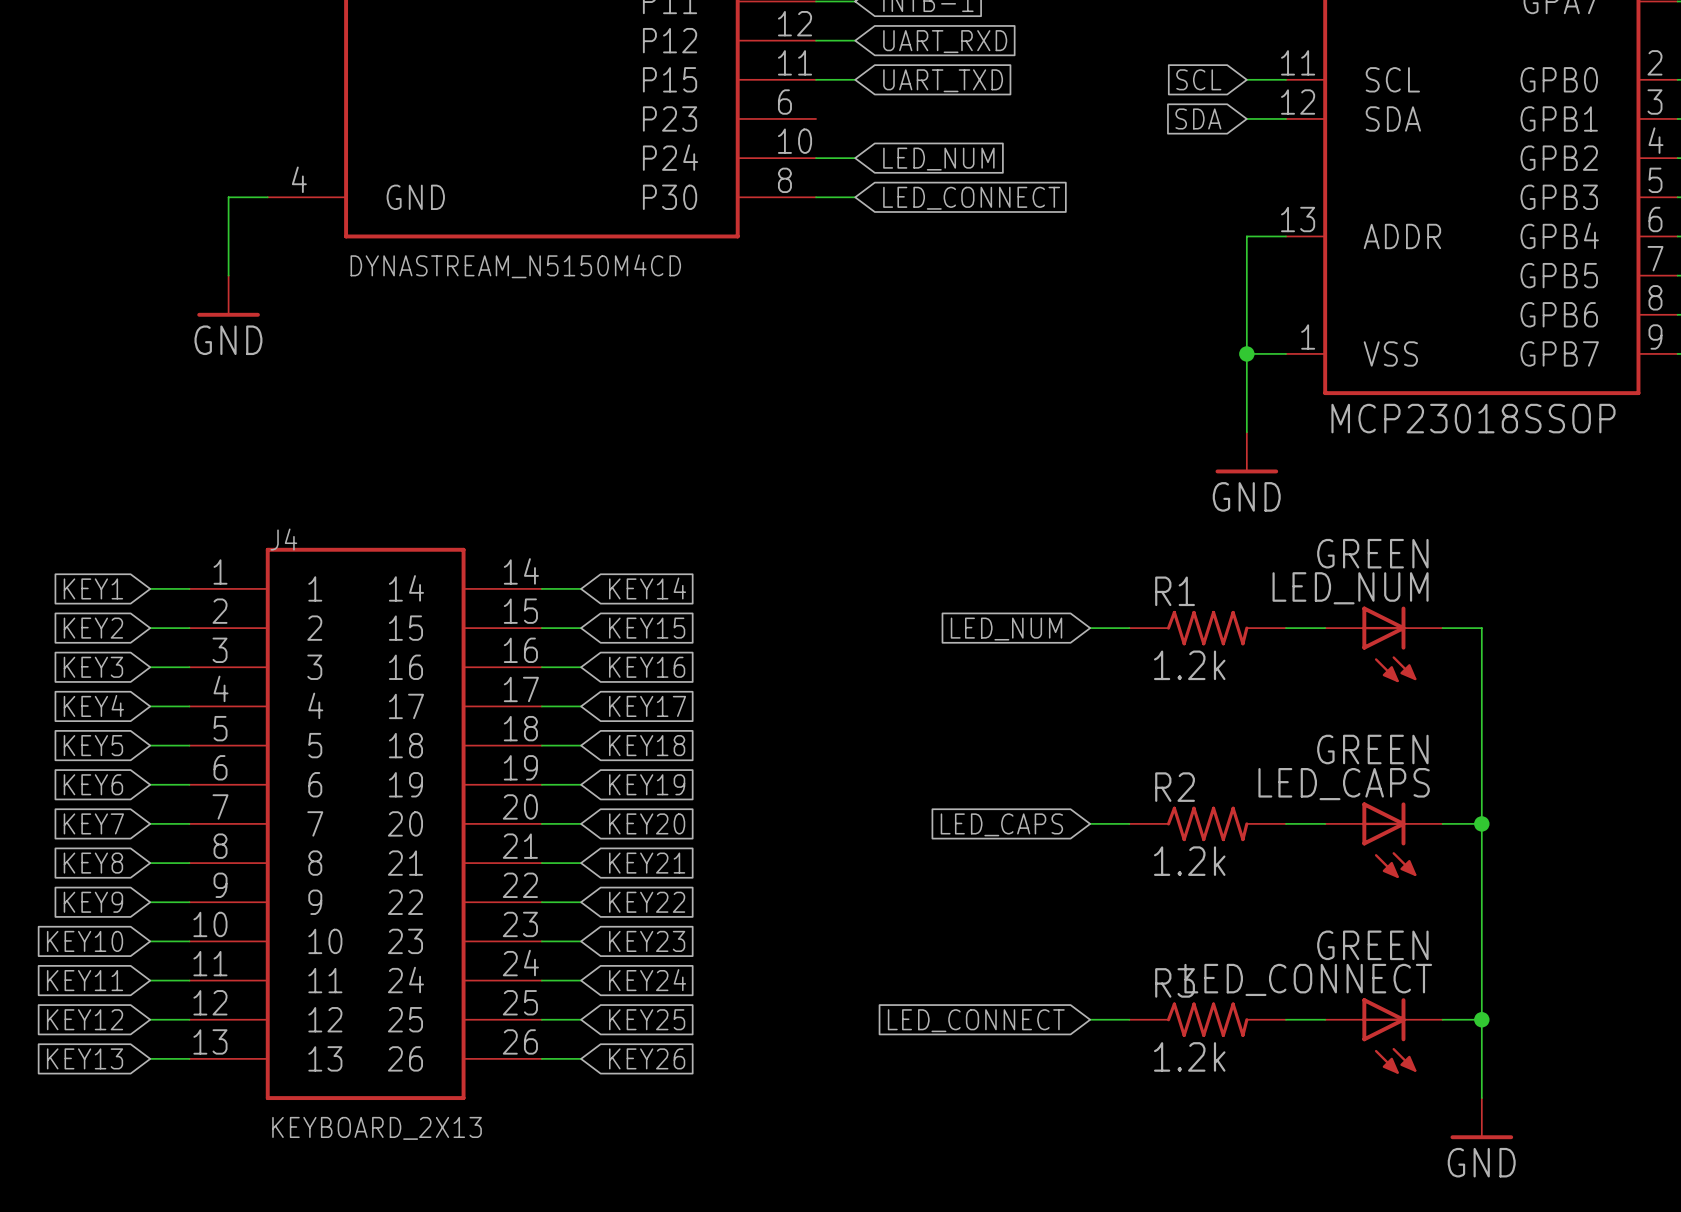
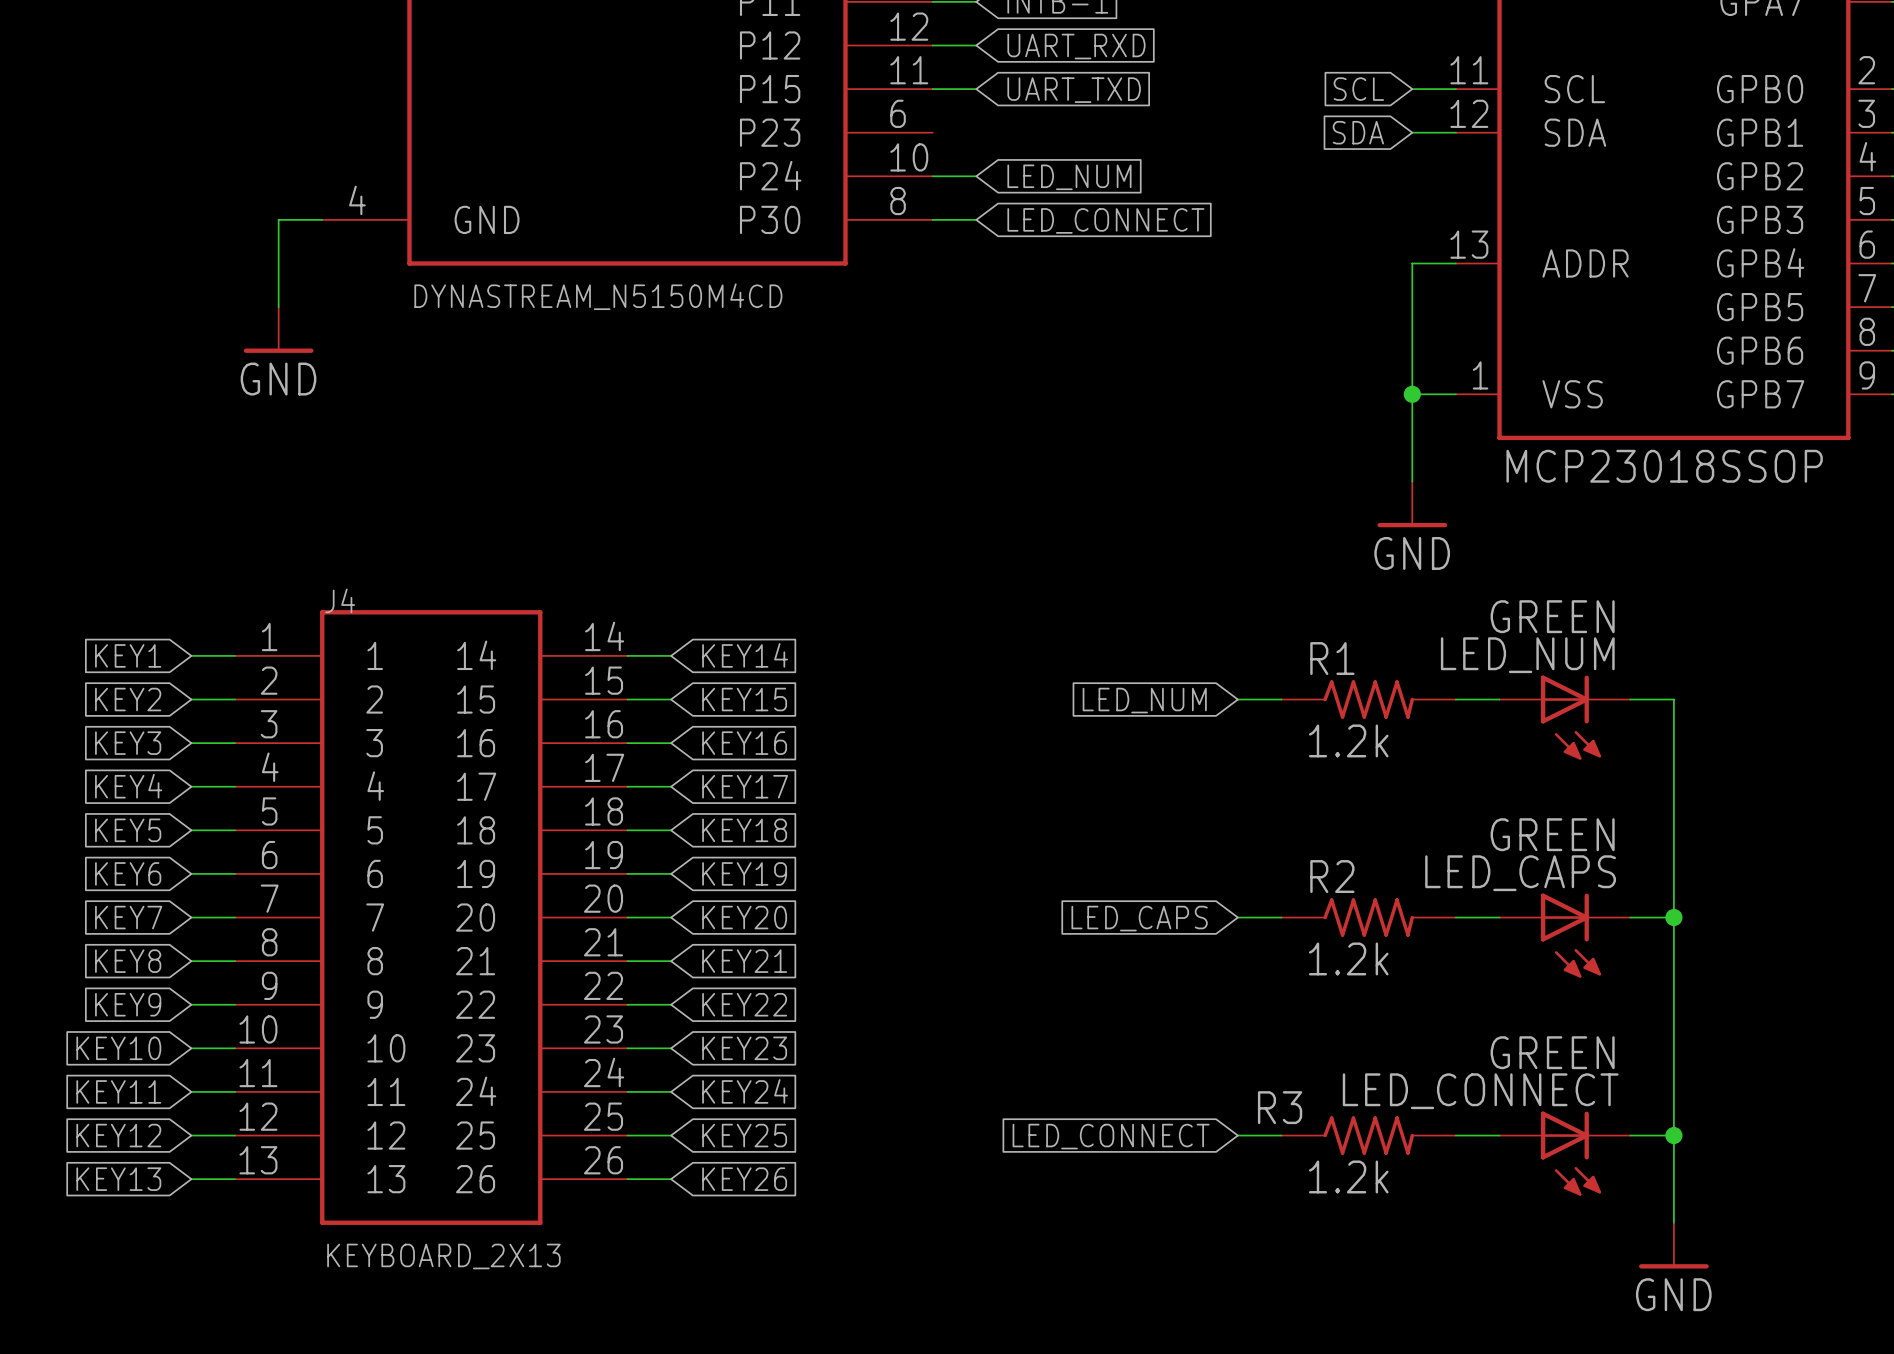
R3 name position: R3 (1175, 982) -> R3 (1280, 1107)

